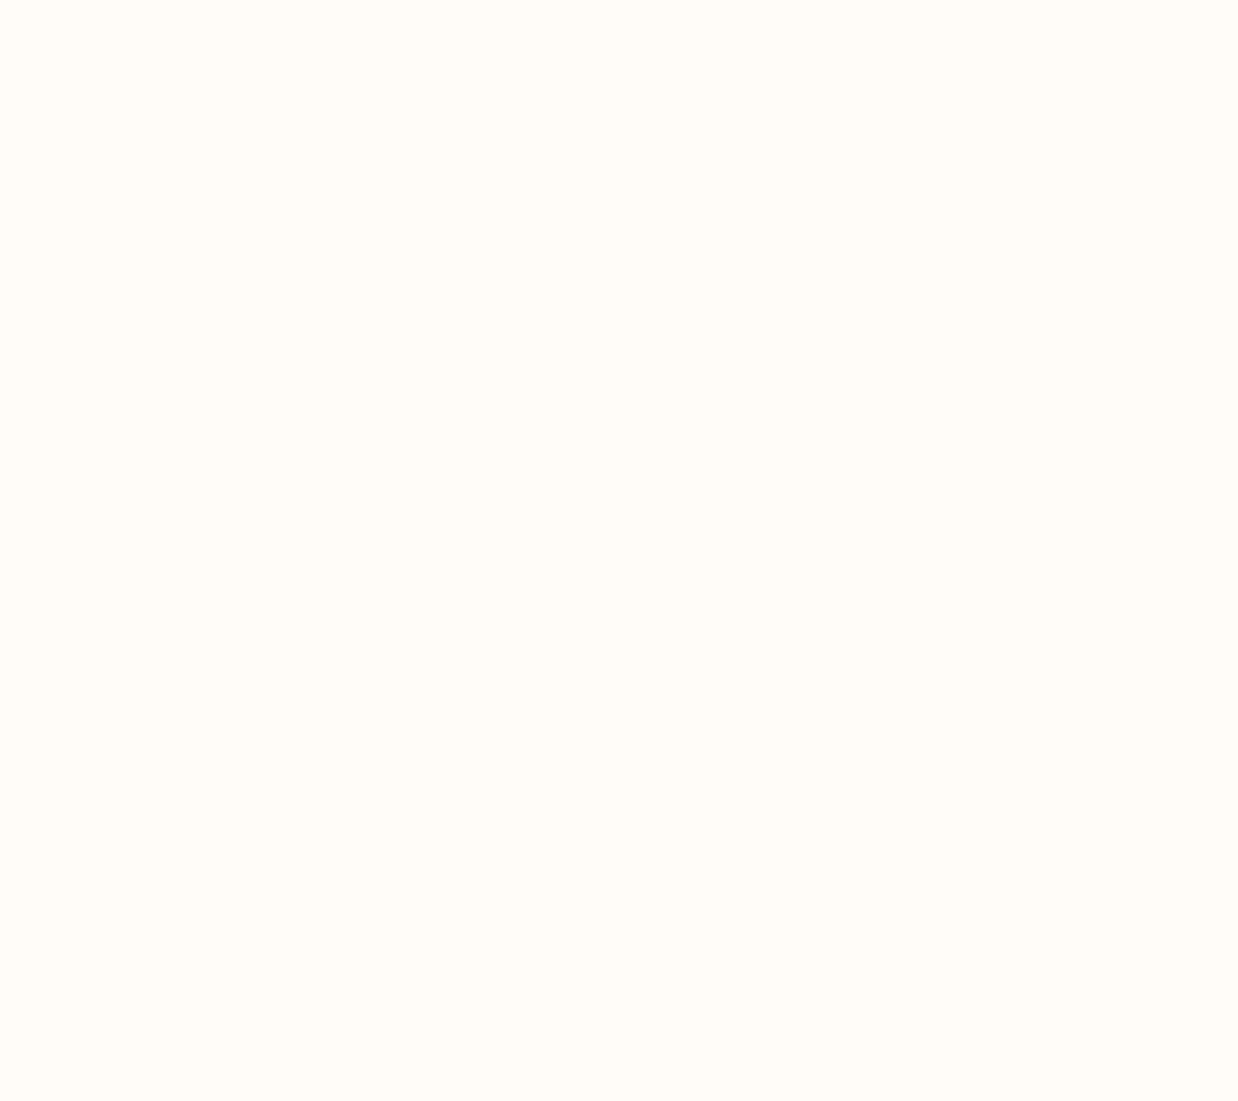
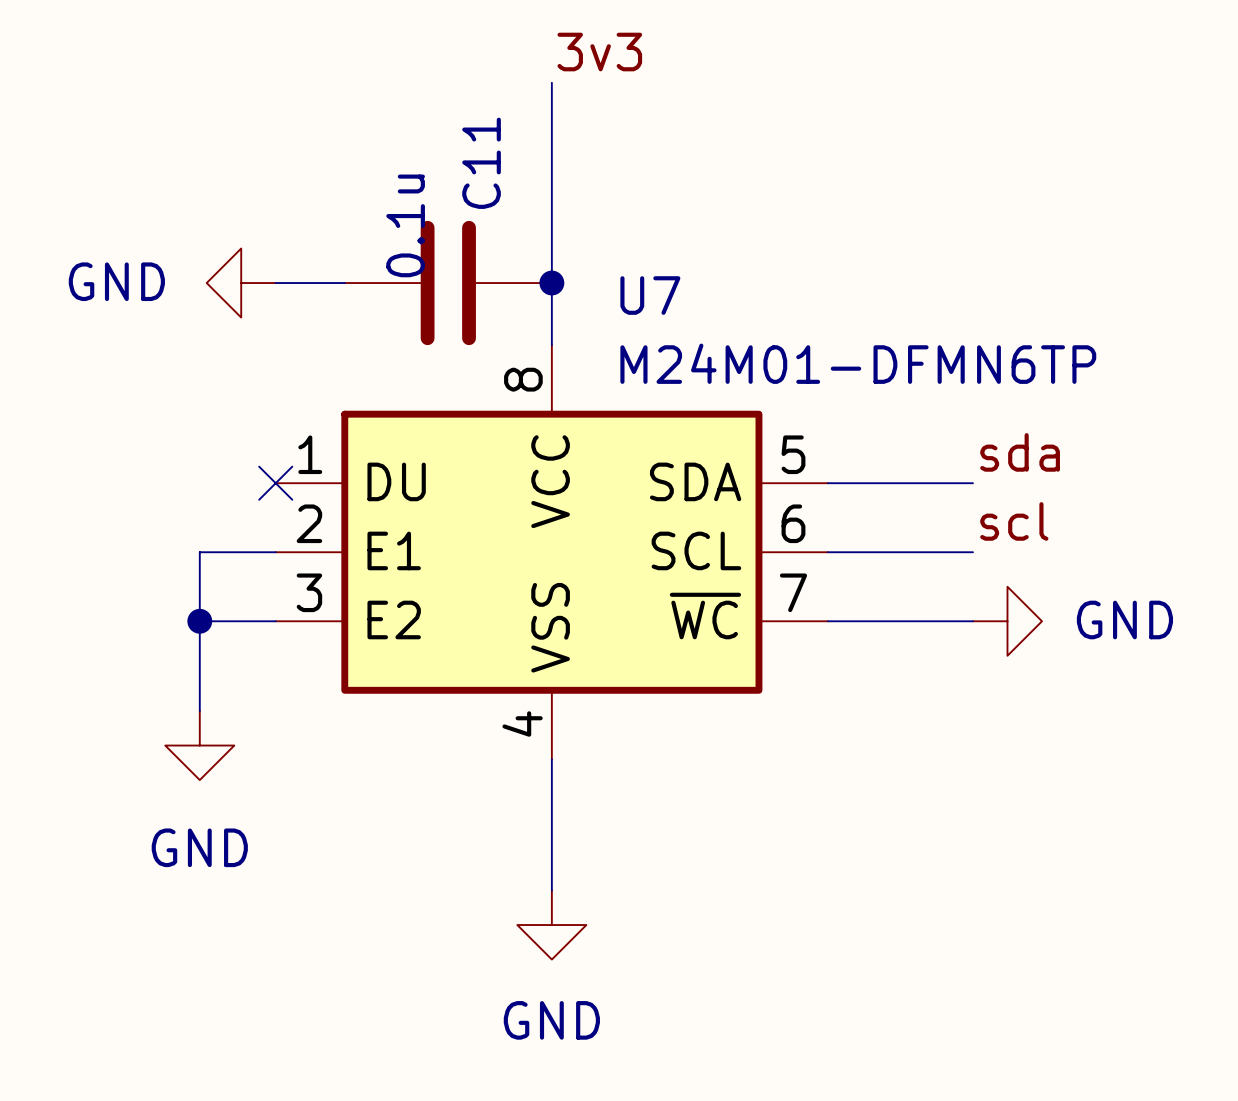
label: none -> 3v3 (599, 52)
wire: none -> (551, 82) (551, 345)
power symbol: none -> GND (241, 283)
wire: none -> (275, 283) (344, 283)
C11: none -> 0.1u (448, 283)
junction: none -> (551, 283)
label: none -> sda (1020, 452)
no-connect mark: none -> (275, 483)
wire: none -> (828, 483) (972, 483)
label: none -> scl (1014, 521)
wire: none -> (275, 552) (199, 552) (199, 711)
U7: none -> M24M01-DFMN6TP (551, 552)
wire: none -> (828, 552) (972, 552)
wire: none -> (199, 621) (275, 621)
junction: none -> (199, 621)
wire: none -> (828, 621) (972, 621)
power symbol: none -> GND (1007, 621)
power symbol: none -> GND (199, 745)
wire: none -> (551, 759) (551, 890)
power symbol: none -> GND (551, 925)

